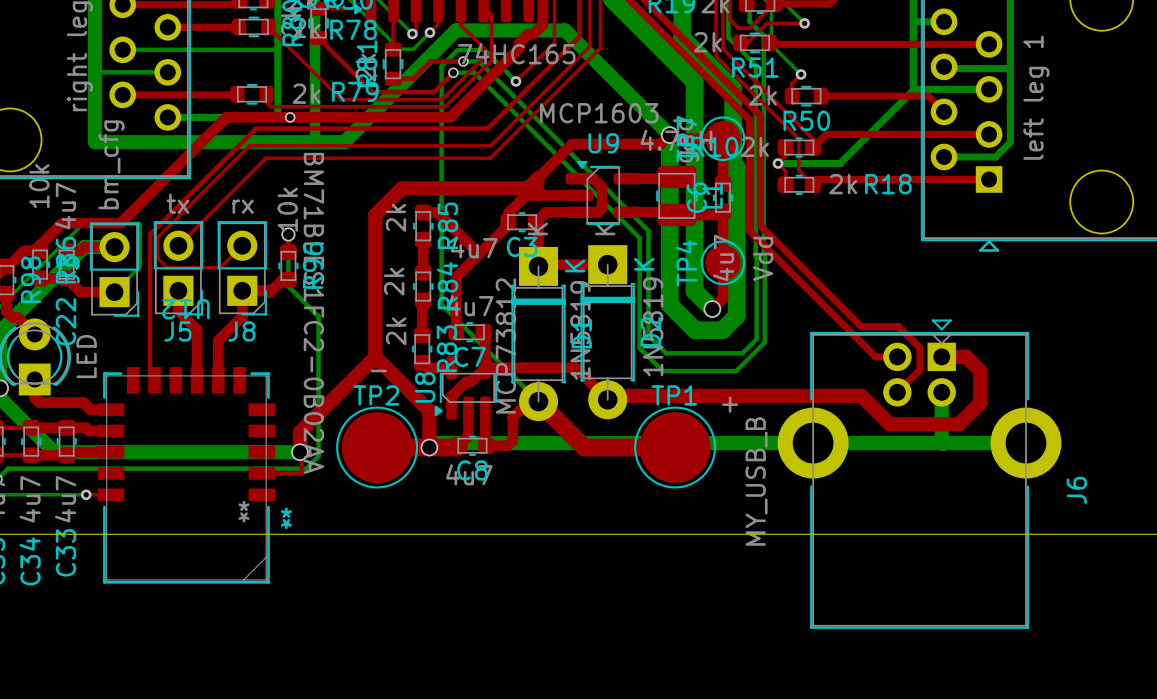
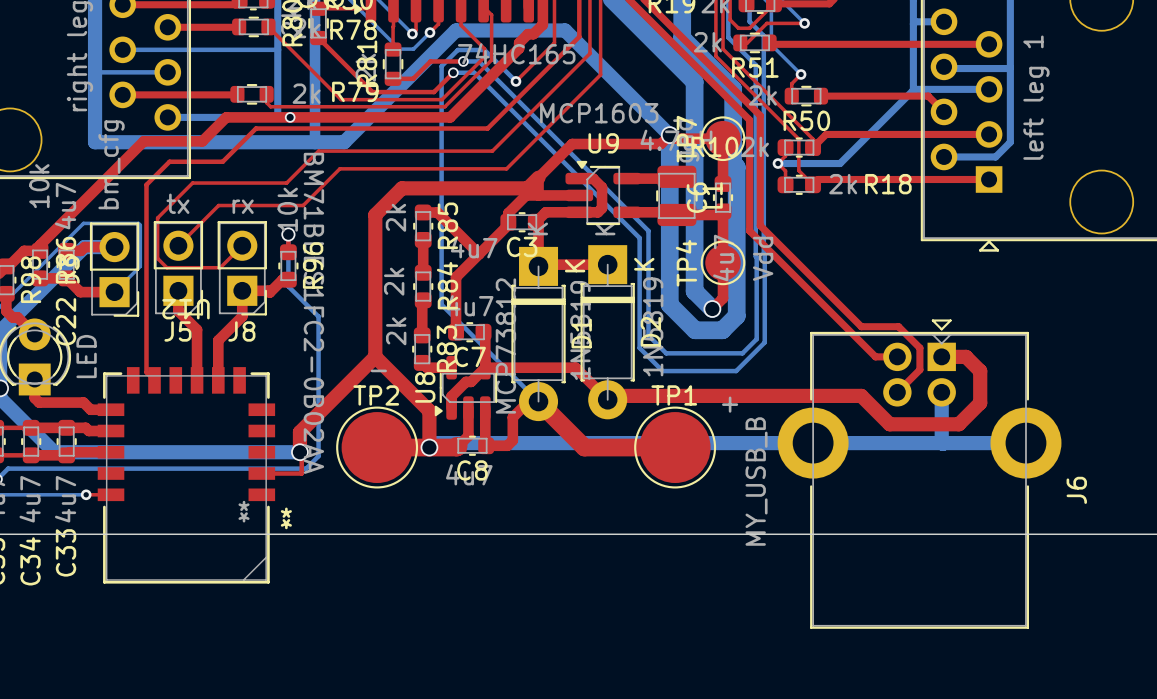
top track: (589, 46) (490, 145) (249, 145) (157, 237) -> (589, 46) (589, 53) (492, 151) (318, 151) (286, 183) (192, 183) (157, 218) (157, 237)
top track: (600, 47) (490, 158) (265, 158) (218, 205) -> (600, 47) (600, 74) (506, 168) (339, 168) (303, 205) (218, 205)
top track: (202, 141) (120, 223) (62, 223) -> (202, 141) (143, 141) (62, 223)
top track: (222, 161) (150, 234) (150, 375) -> (222, 161) (169, 161) (146, 184) (146, 372) (150, 375)

